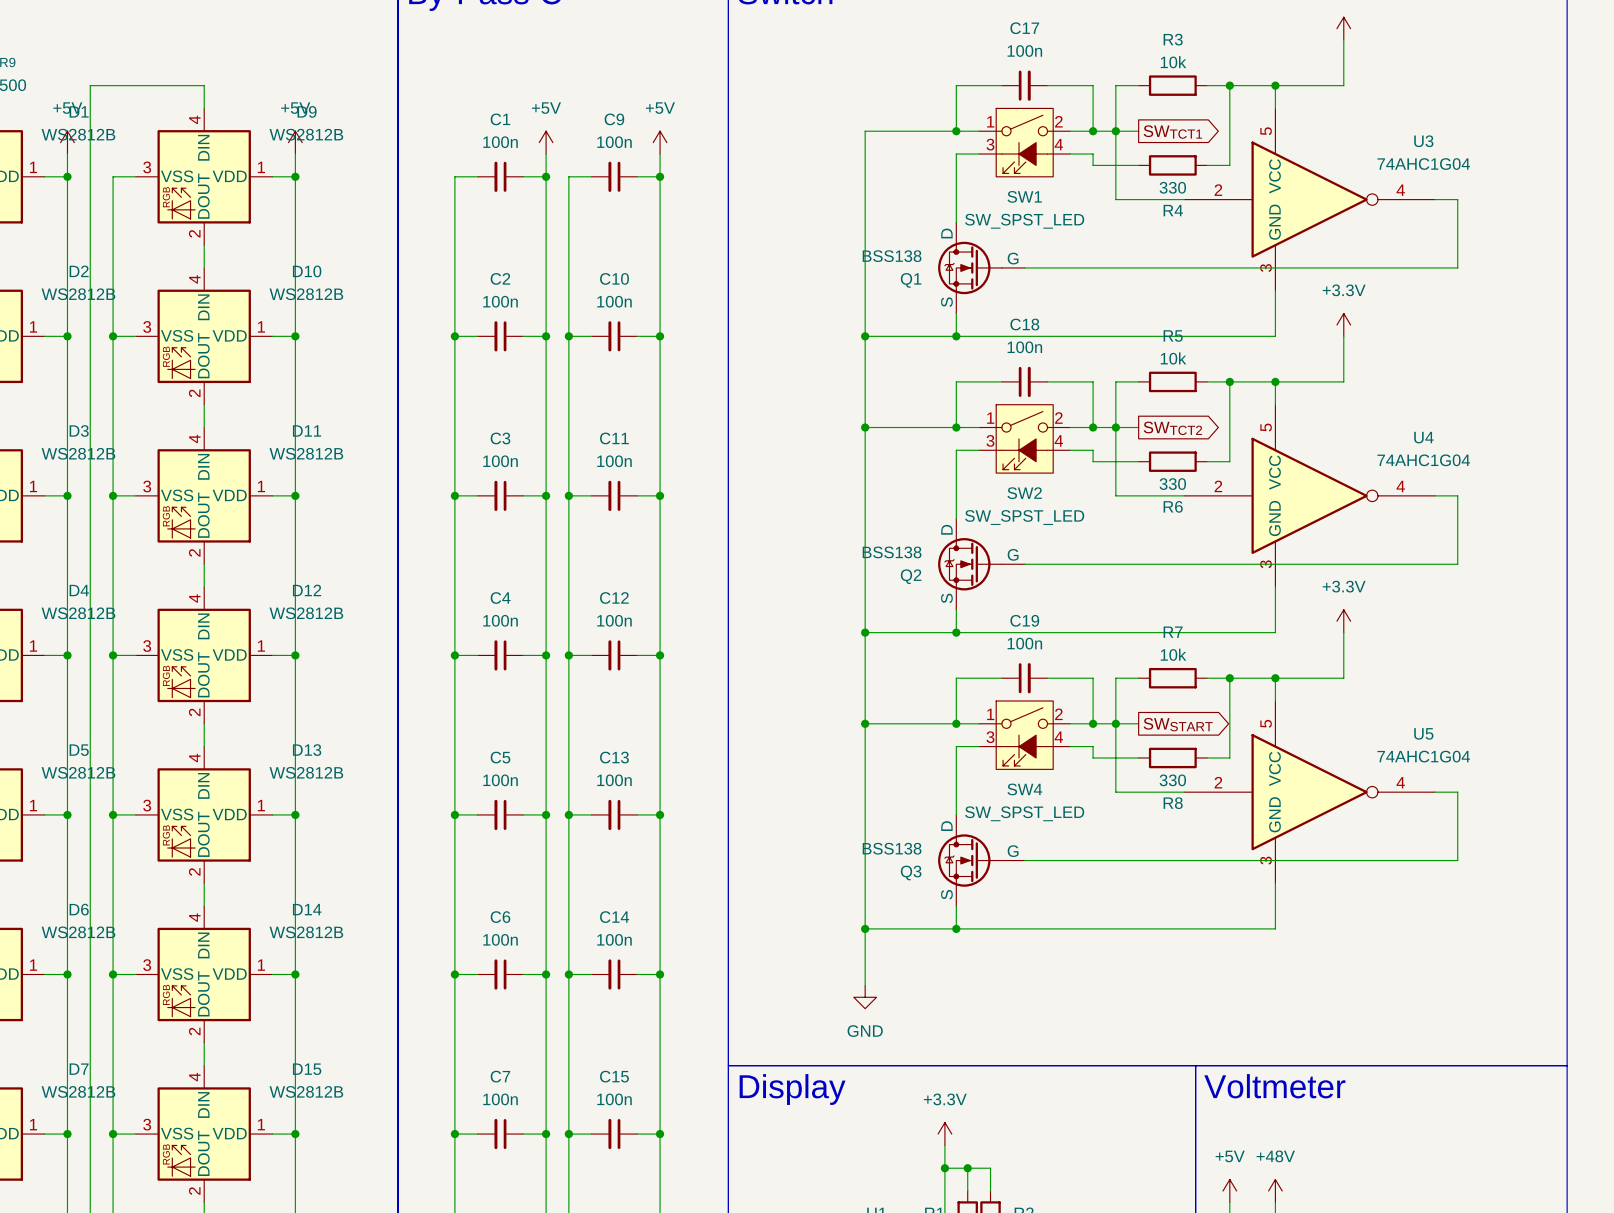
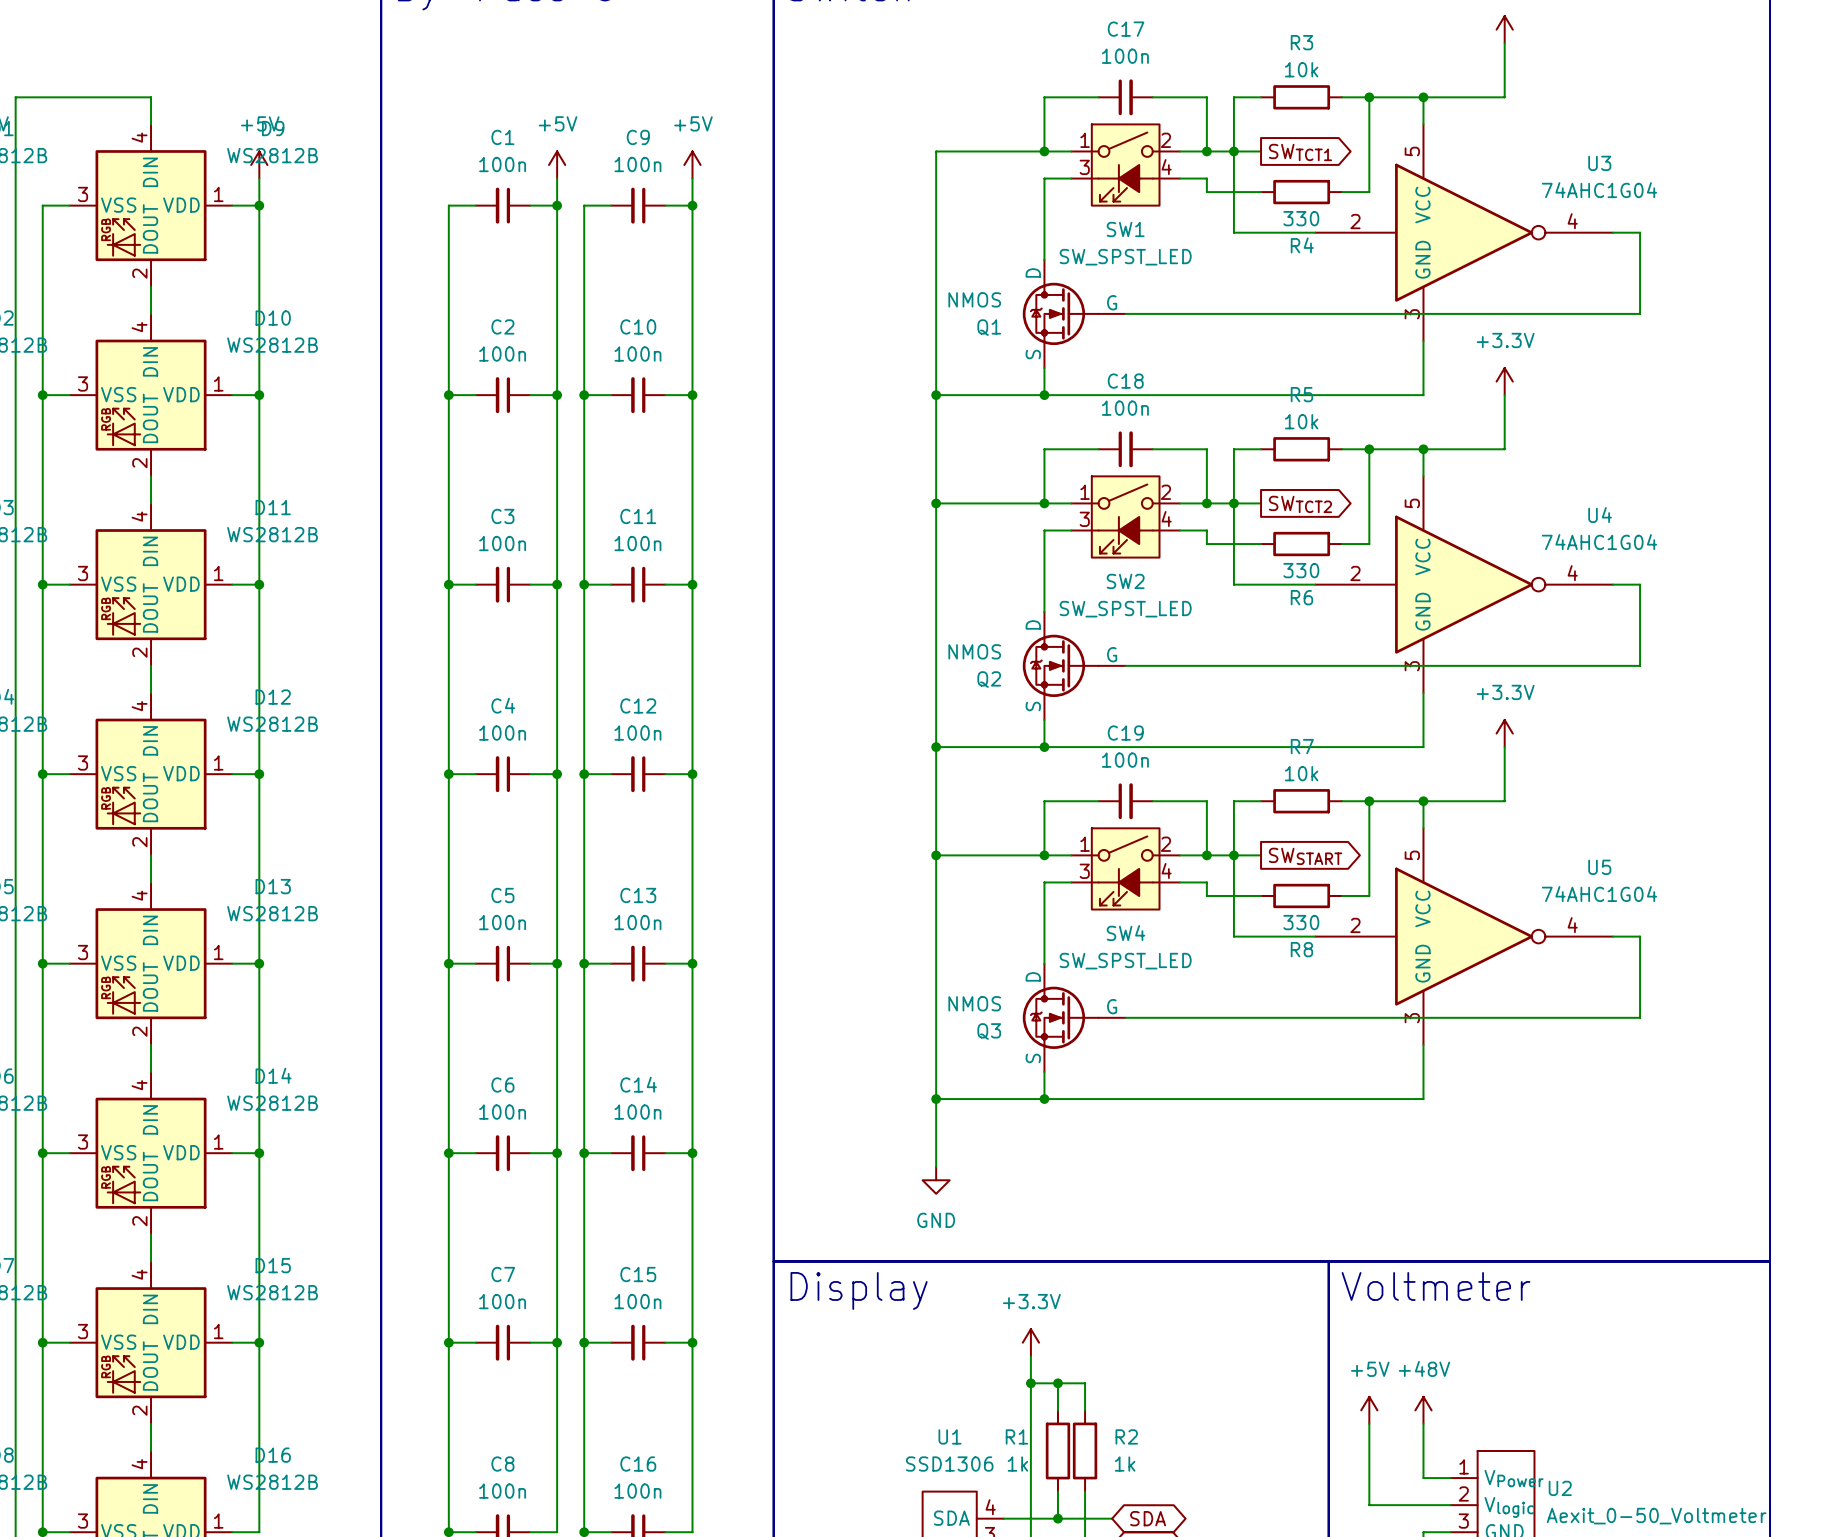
Q1 value: BSS138 (892, 256) -> NMOS (974, 299)
Q2 value: BSS138 (892, 552) -> NMOS (974, 651)
Q3 value: BSS138 (892, 848) -> NMOS (974, 1003)

